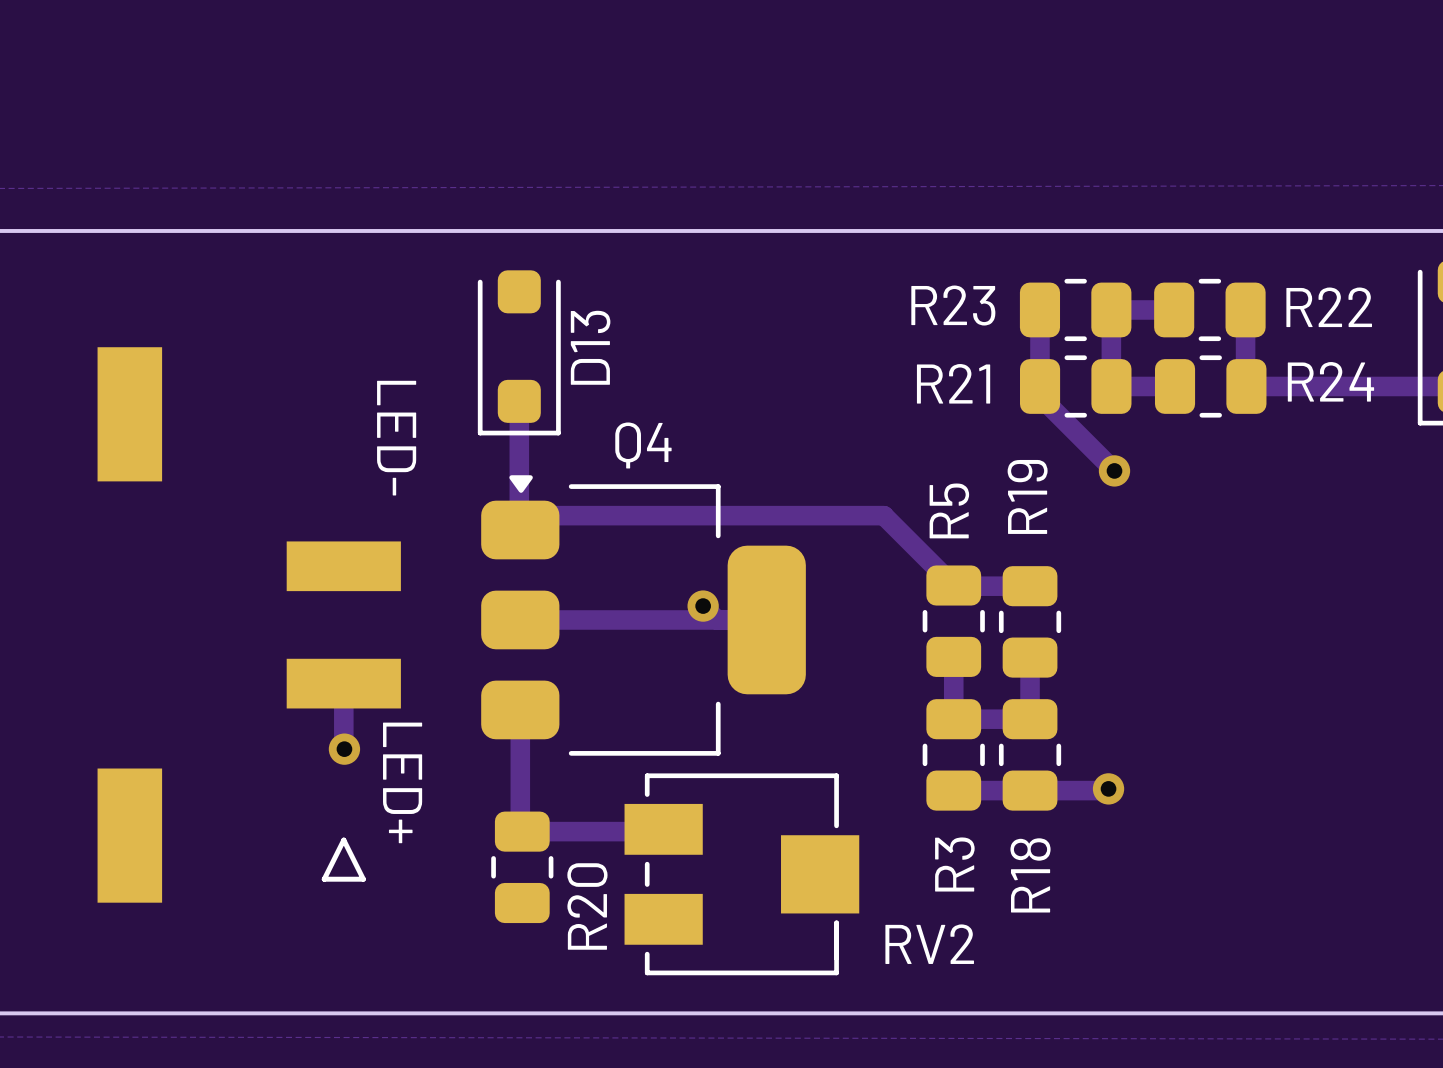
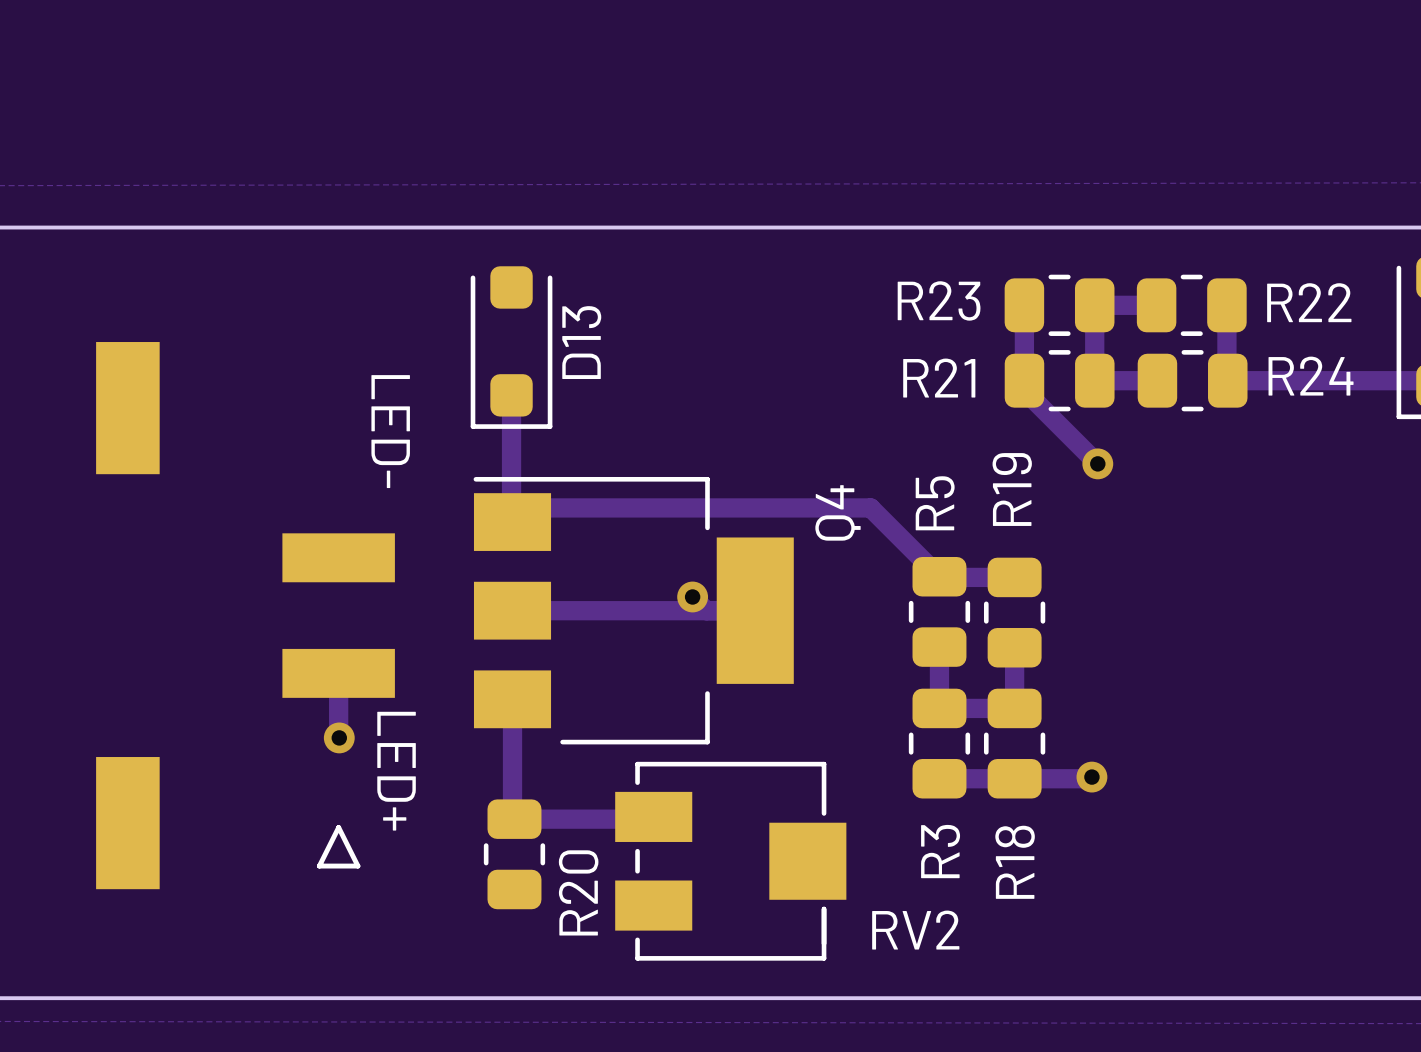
Q4 name rotation: 0° (643, 445) -> 90° counterclockwise (837, 512)
Q4 name position: Q4 (643, 445) -> Q4 (837, 512)
Q4 footprint: [481, 475, 806, 756] -> [473, 476, 794, 745]

